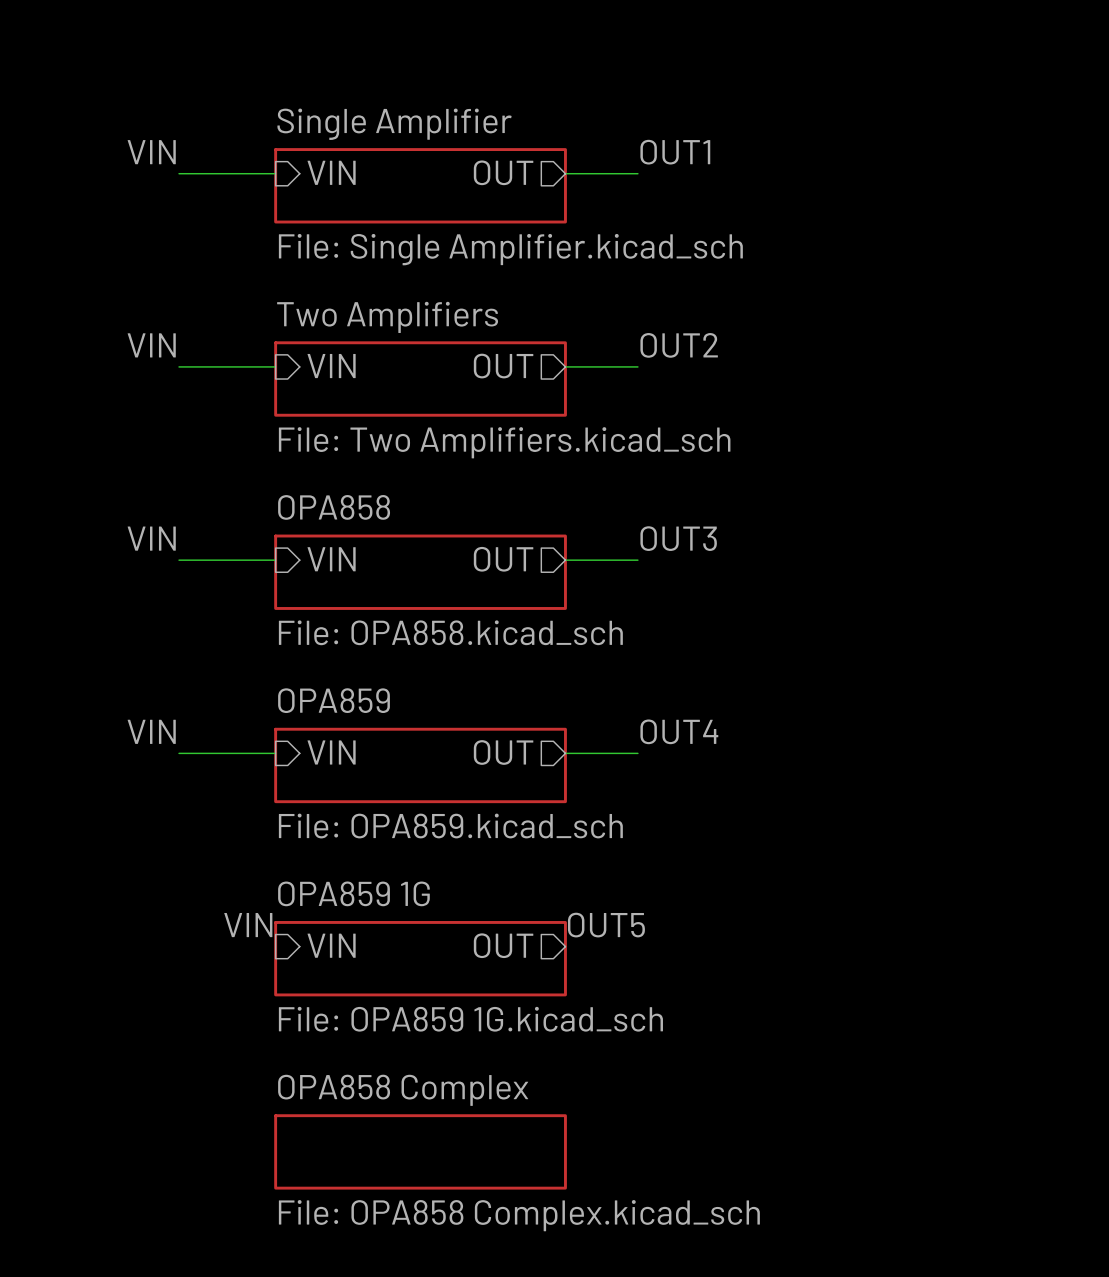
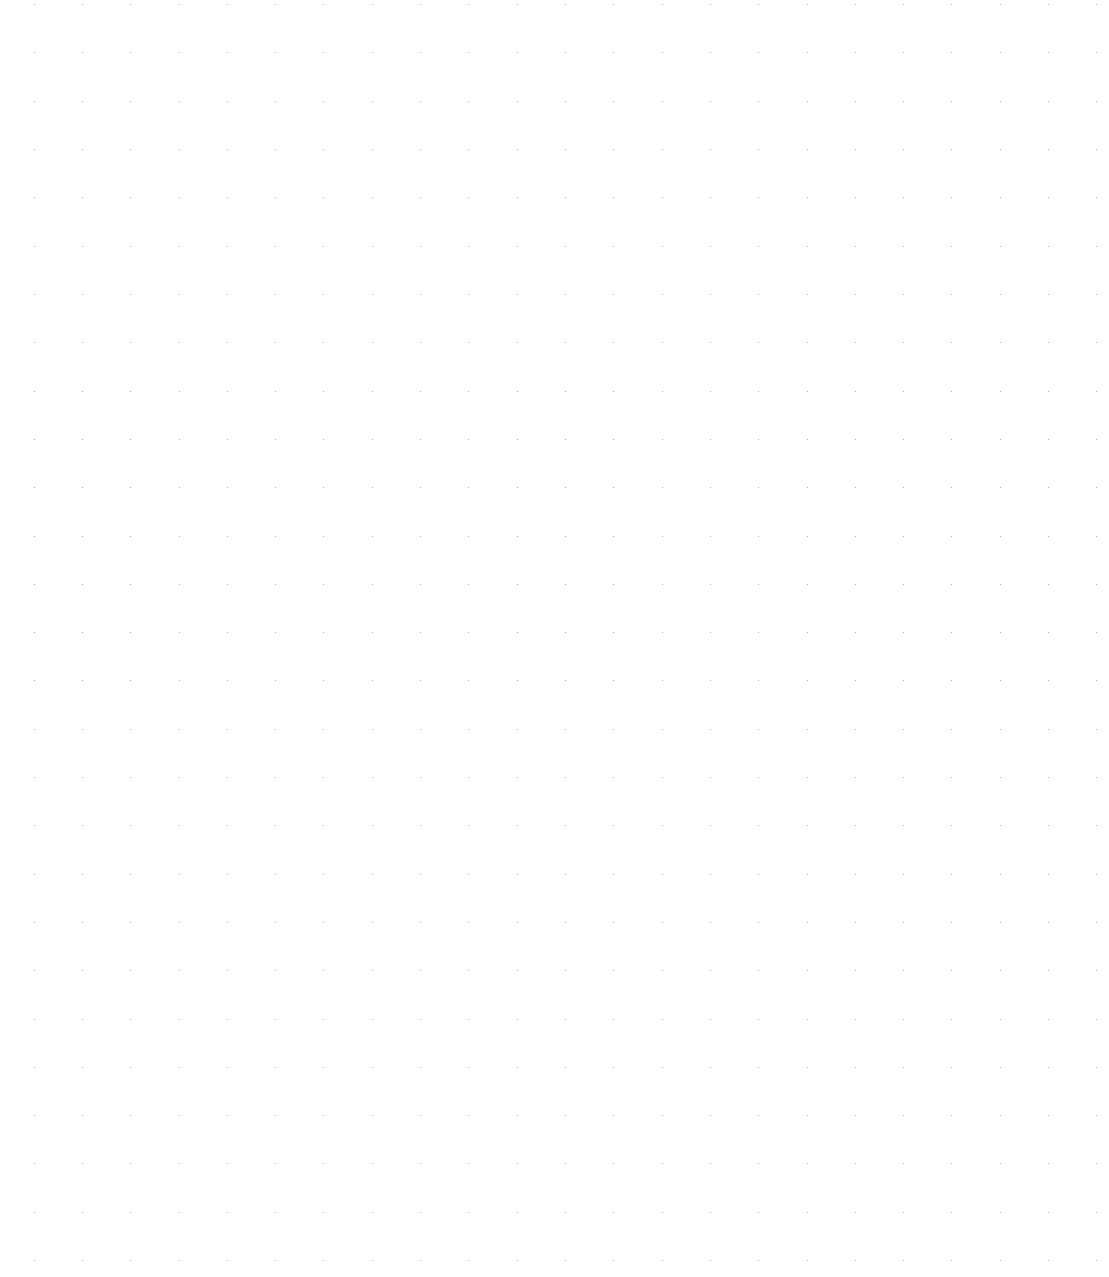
label: VIN (151, 152) -> none
label: OUT1 (675, 152) -> none
sheet pin: VIN (331, 172) -> none
sheet pin: OUT (503, 172) -> none
wire: (179, 173) (275, 173) -> none
wire: (565, 173) (637, 173) -> none
sheet Single Amplifier: File: Single Amplifier.kicad_sch (420, 185) -> none
label: VIN (151, 345) -> none
label: OUT2 (679, 345) -> none
wire: (179, 366) (275, 366) -> none
sheet pin: VIN (331, 366) -> none
sheet pin: OUT (503, 366) -> none
wire: (565, 366) (637, 366) -> none
sheet Two Amplifiers: File: Two Amplifiers.kicad_sch (420, 379) -> none
label: VIN (151, 538) -> none
label: OUT3 (678, 538) -> none
sheet pin: VIN (331, 559) -> none
sheet pin: OUT (503, 559) -> none
wire: (179, 560) (275, 560) -> none
wire: (565, 560) (637, 560) -> none
sheet OPA858: File: OPA858.kicad_sch (420, 572) -> none
label: VIN (151, 731) -> none
label: OUT4 (679, 731) -> none
sheet pin: VIN (331, 752) -> none
sheet pin: OUT (503, 752) -> none
wire: (179, 753) (275, 753) -> none
wire: (565, 753) (637, 753) -> none
sheet OPA859: File: OPA859.kicad_sch (420, 765) -> none
label: VIN (248, 925) -> none
label: OUT5 (606, 925) -> none
sheet pin: VIN (331, 945) -> none
sheet pin: OUT (503, 945) -> none
sheet OPA859 1G: File: OPA859 1G.kicad_sch (420, 958) -> none
sheet OPA858 Complex: File: OPA858 Complex.kicad_sch (420, 1151) -> none

